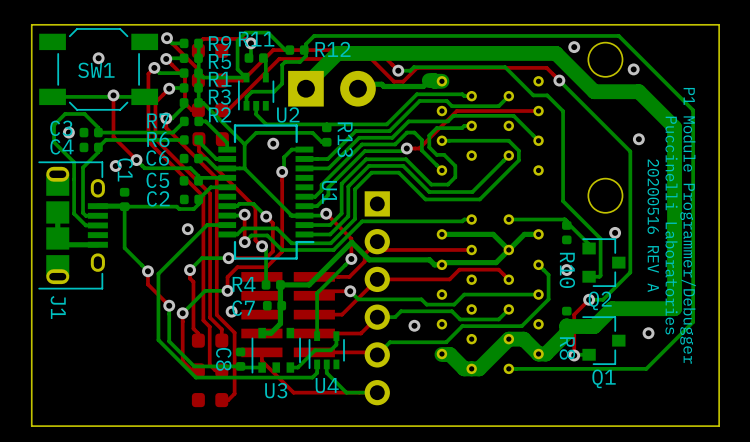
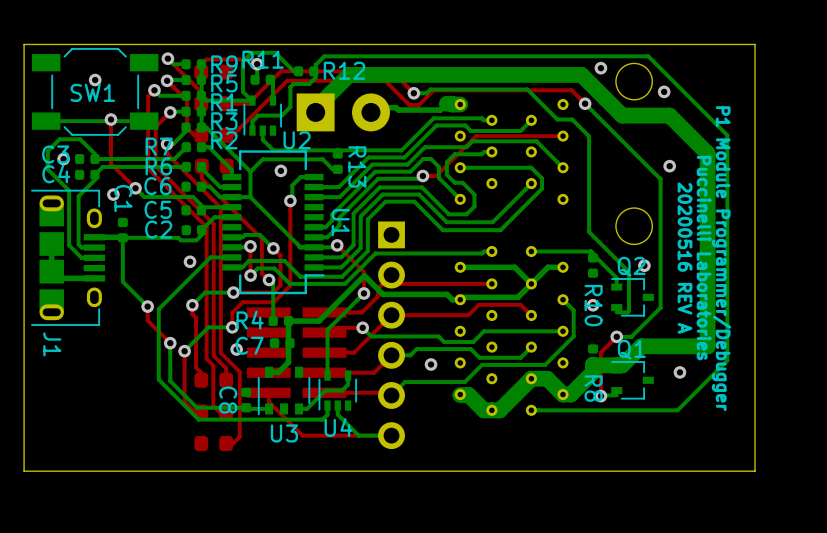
Q2 footprint: [582, 238, 626, 287] -> [611, 278, 654, 317]
Q2 name position: Q2 (600, 300) -> Q2 (631, 266)
Q1 footprint: [582, 316, 626, 366] -> [611, 361, 654, 400]
Q1 name position: Q1 (604, 378) -> Q1 (631, 349)

